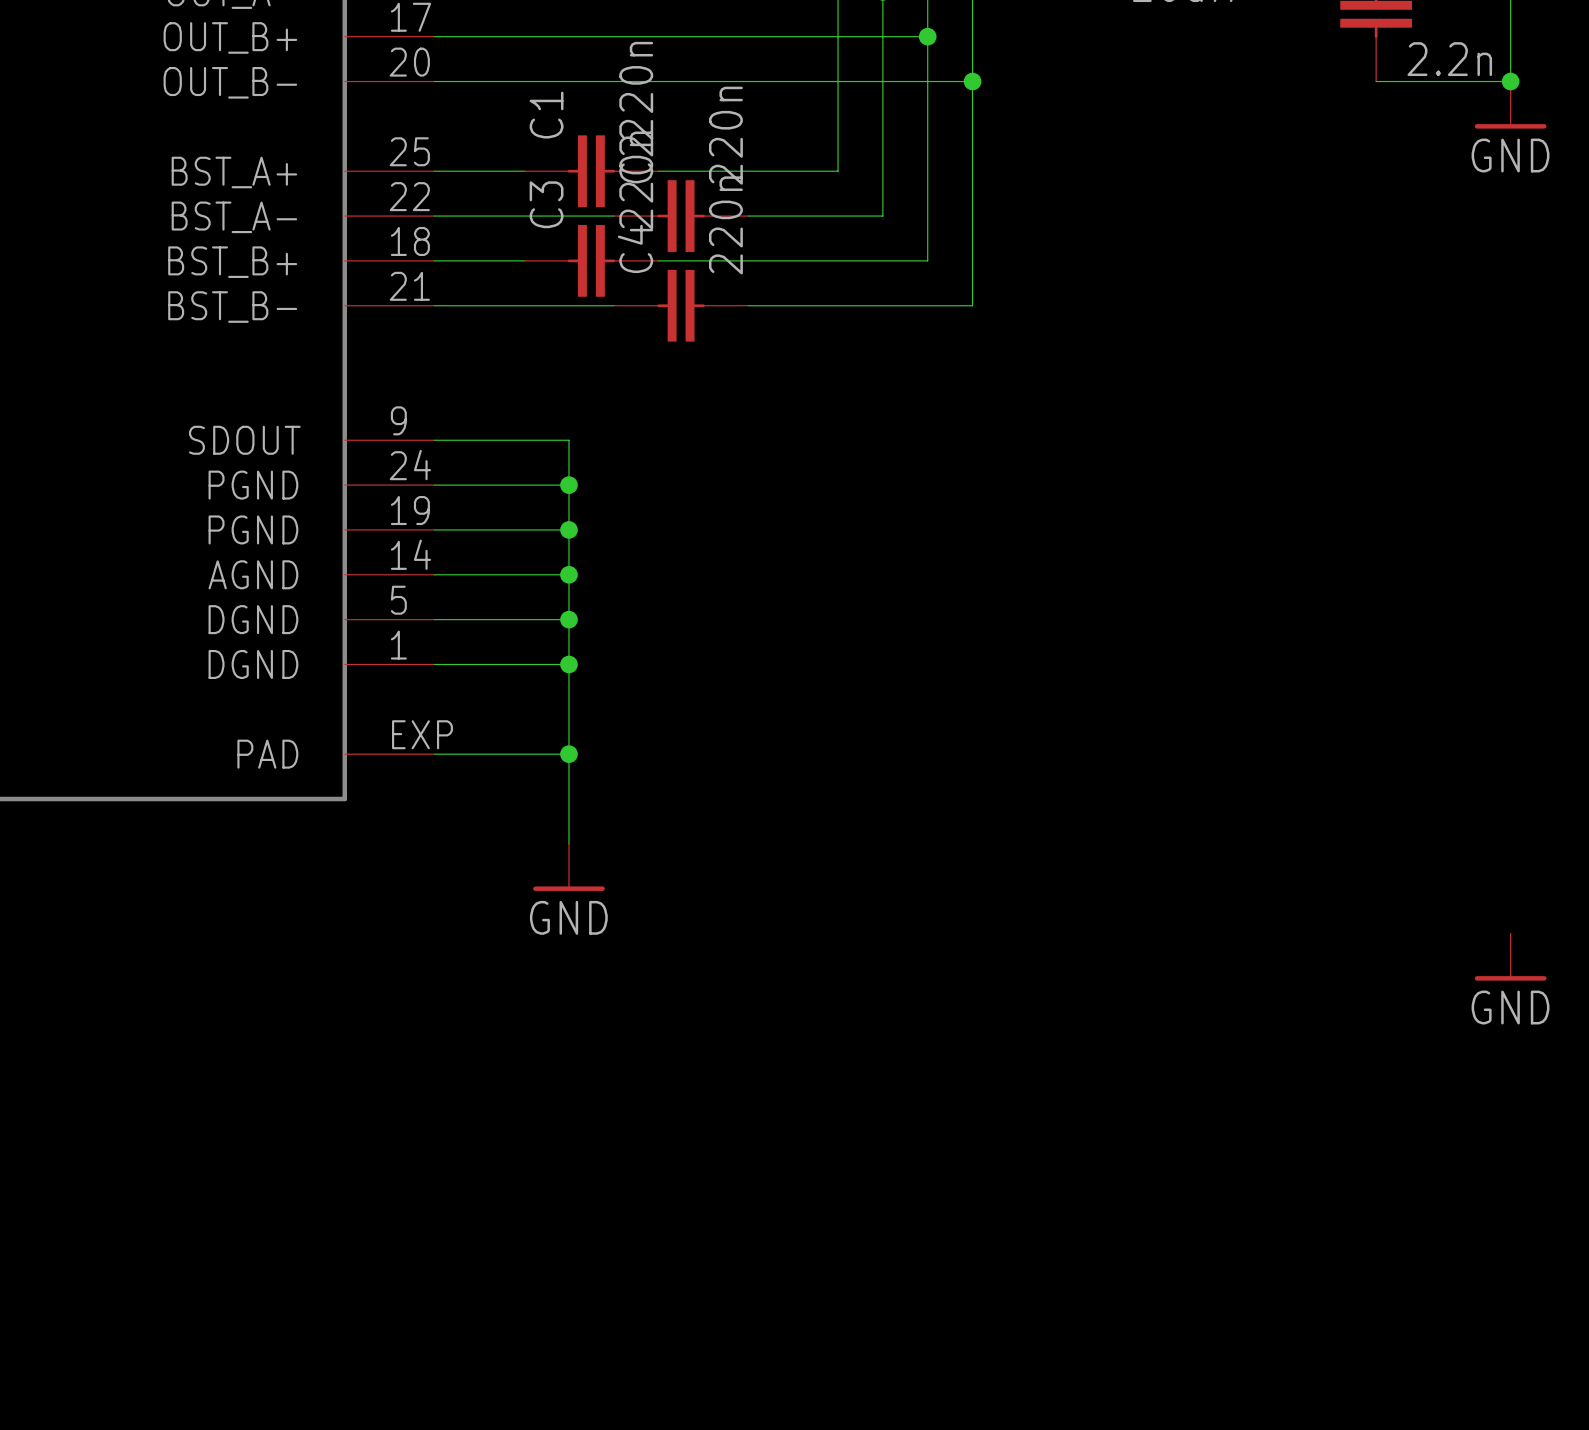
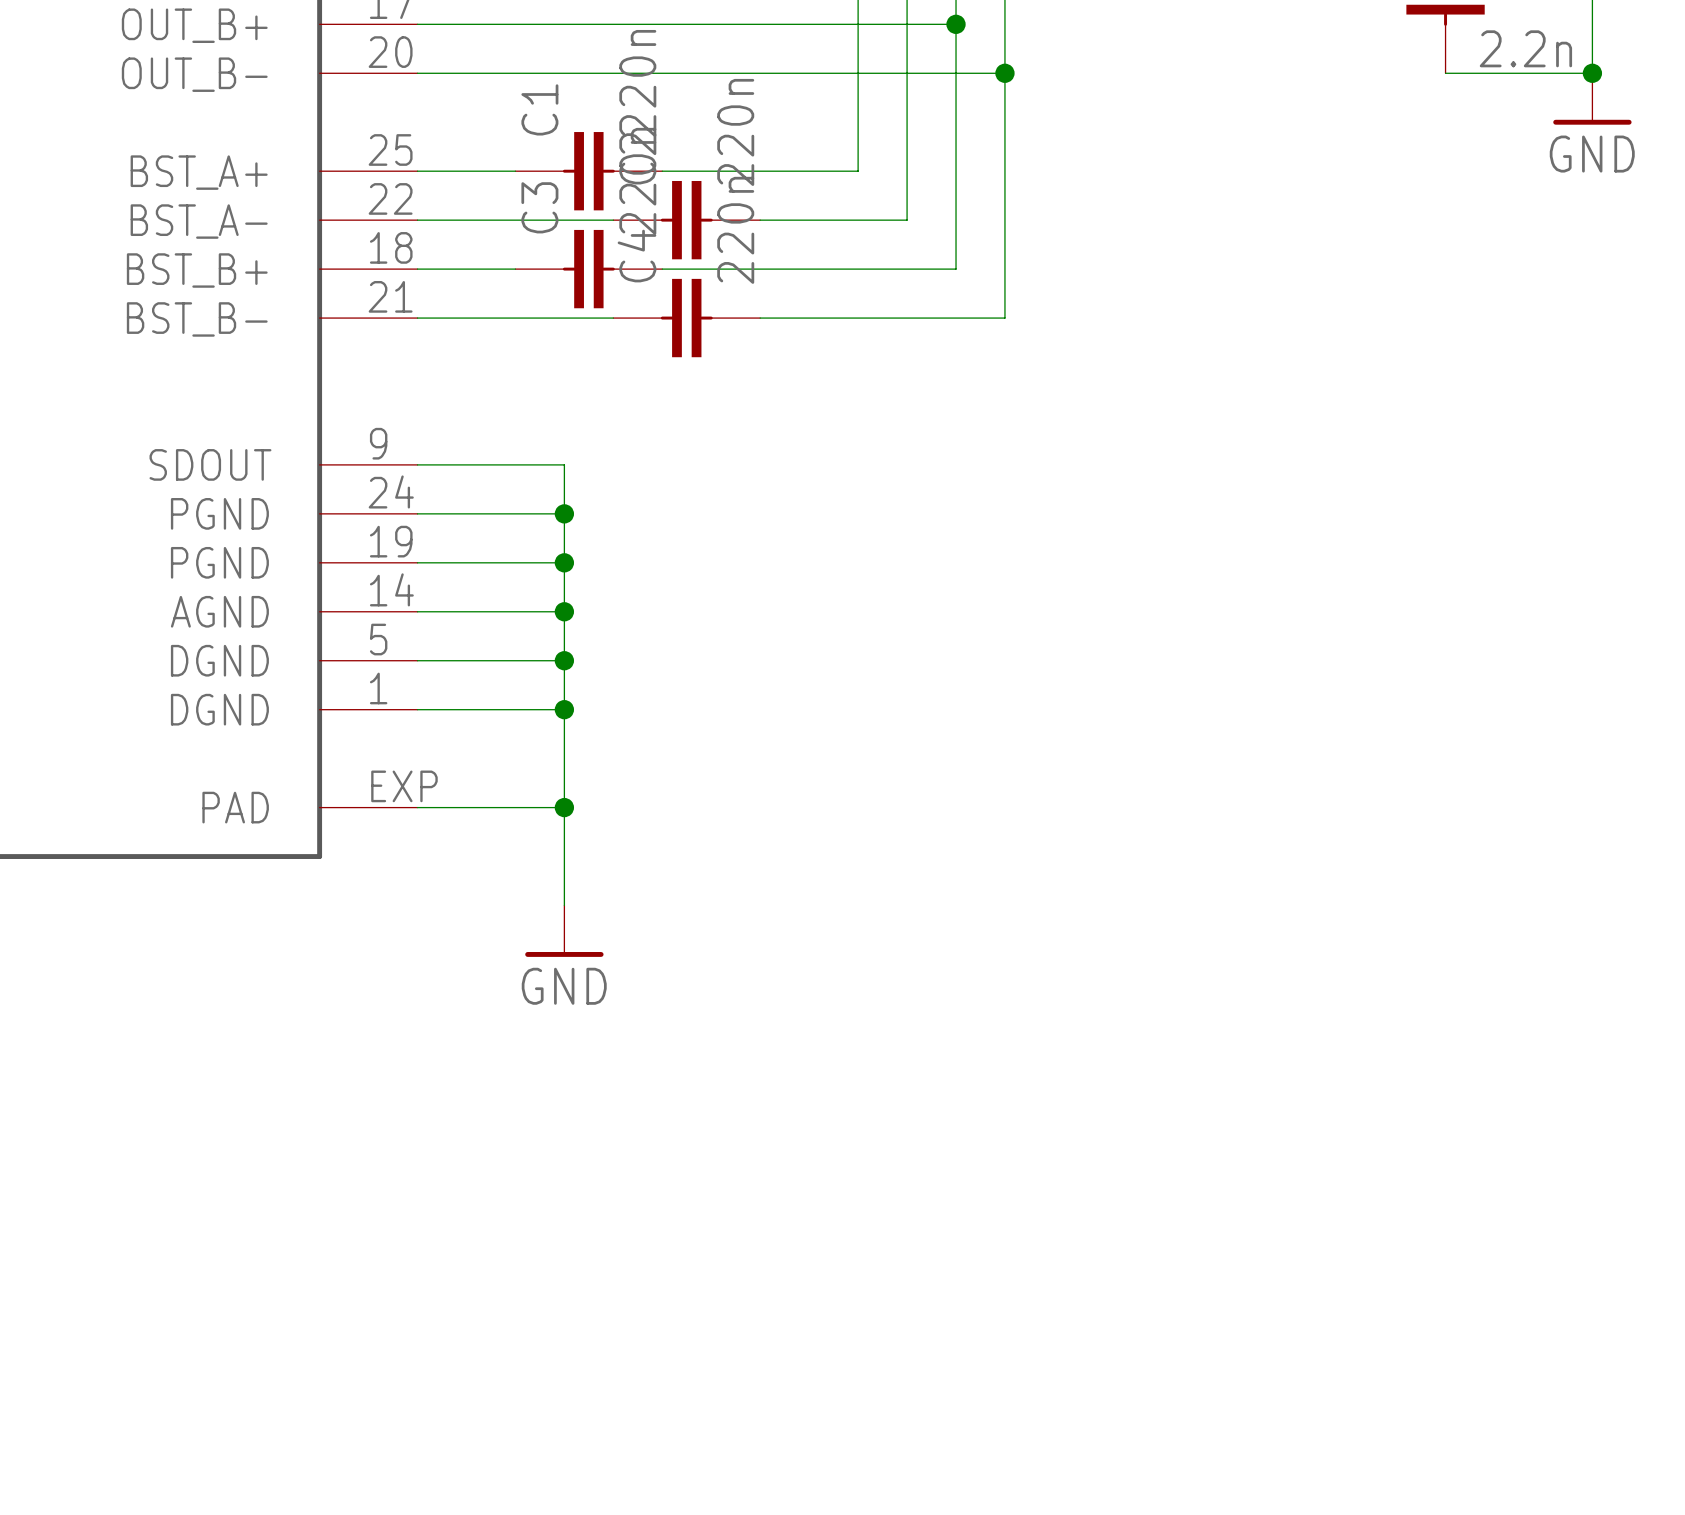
power symbol: GND (1510, 957) -> none

